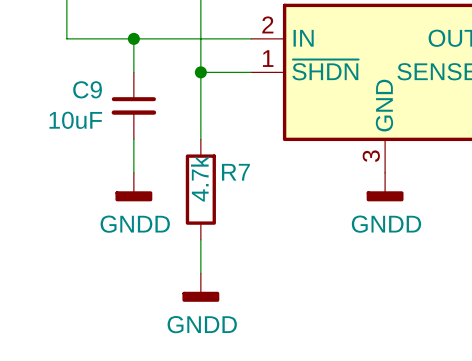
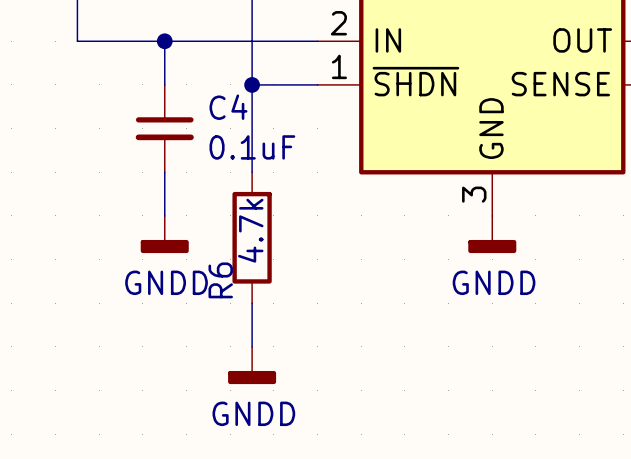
C9 name: C9 (87, 89) -> C4 (228, 107)
C9 value: 10uF (75, 120) -> 0.1uF (252, 147)
R7 name: R7 (235, 172) -> R6 (220, 280)

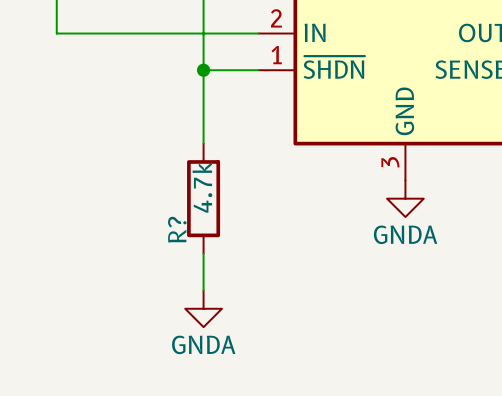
wire: (164, 41) (164, 84) -> none
junction: (164, 41) -> none
C4: 0.1uF (164, 128) -> none
wire: (164, 172) (164, 215) -> none
power symbol: GNDD (164, 234) -> none
power symbol: GNDD (492, 234) -> GNDA (405, 198)
R6 name: R6 (220, 280) -> R? (177, 229)
power symbol: GNDD (252, 365) -> GNDA (203, 308)

